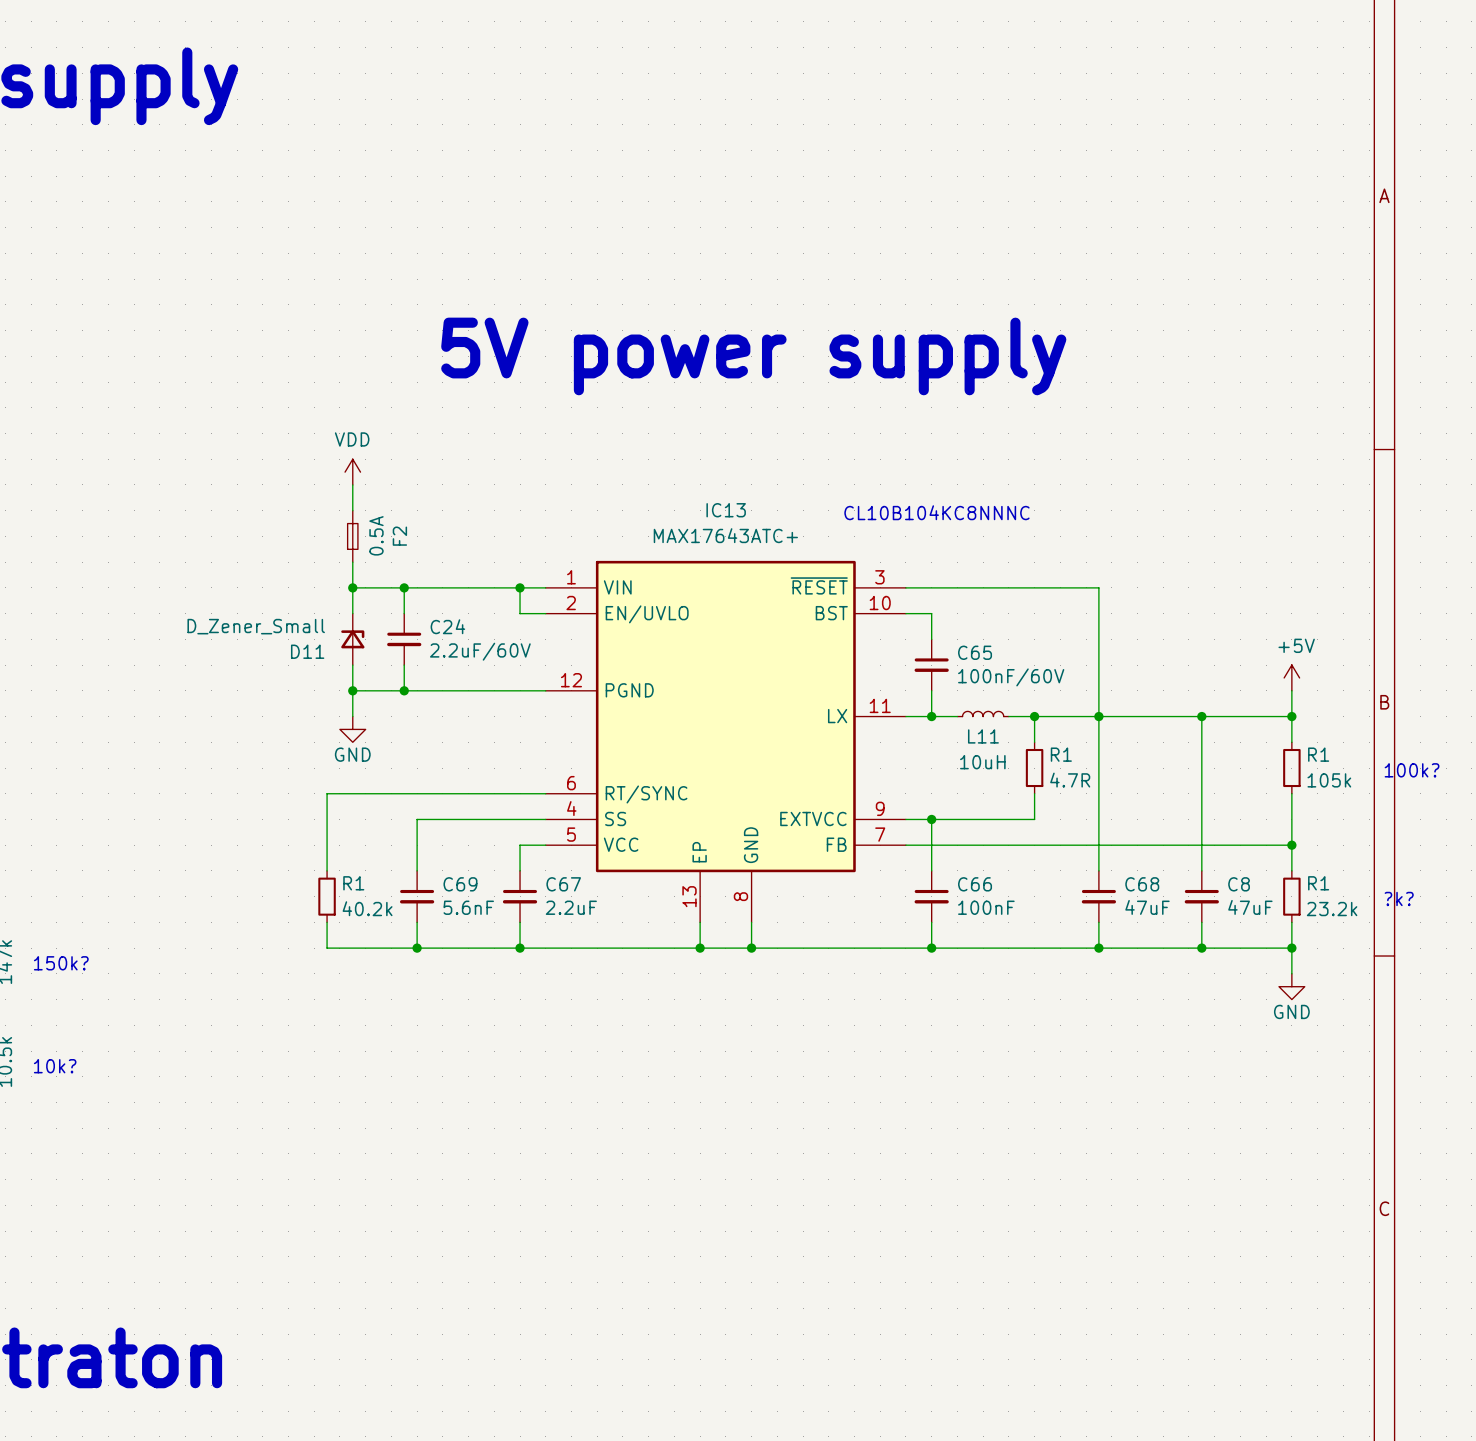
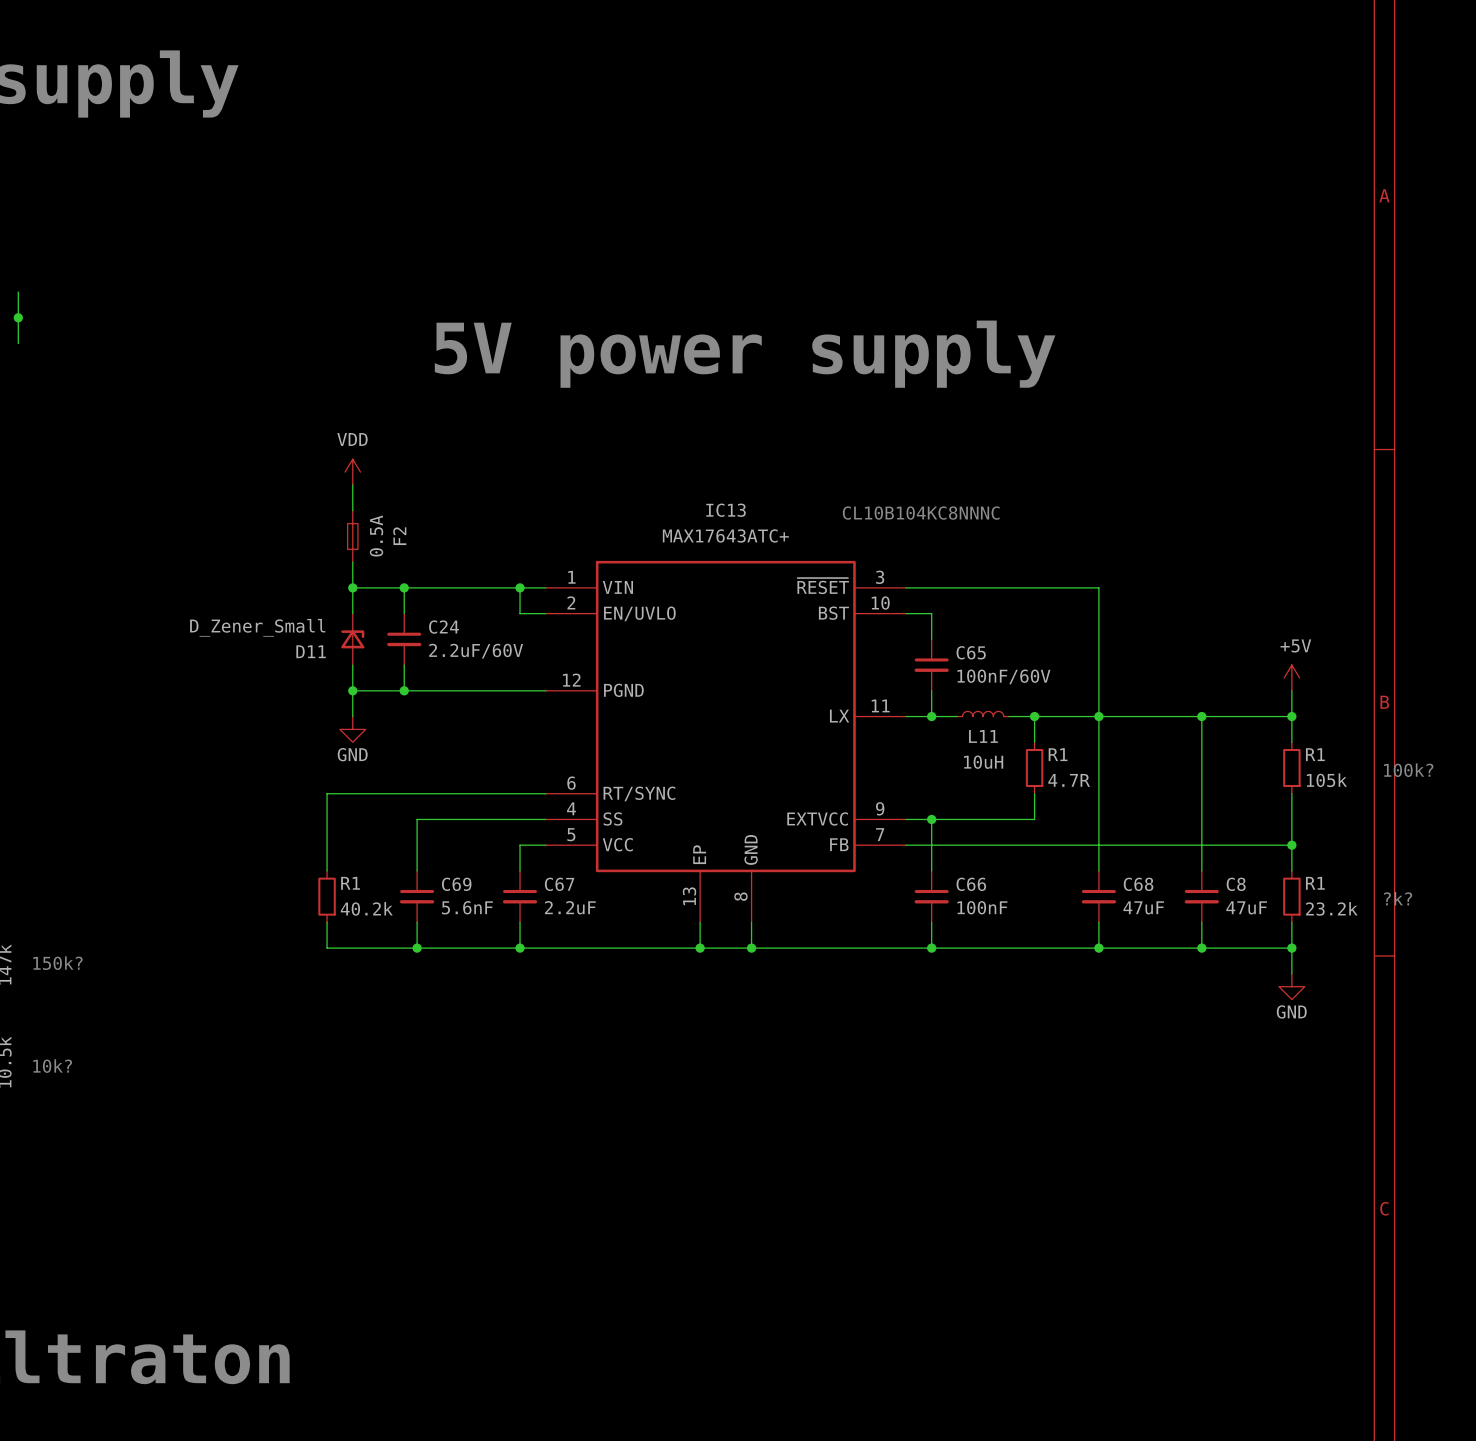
wire: none -> (18, 292) (18, 343)
junction: none -> (18, 317)

